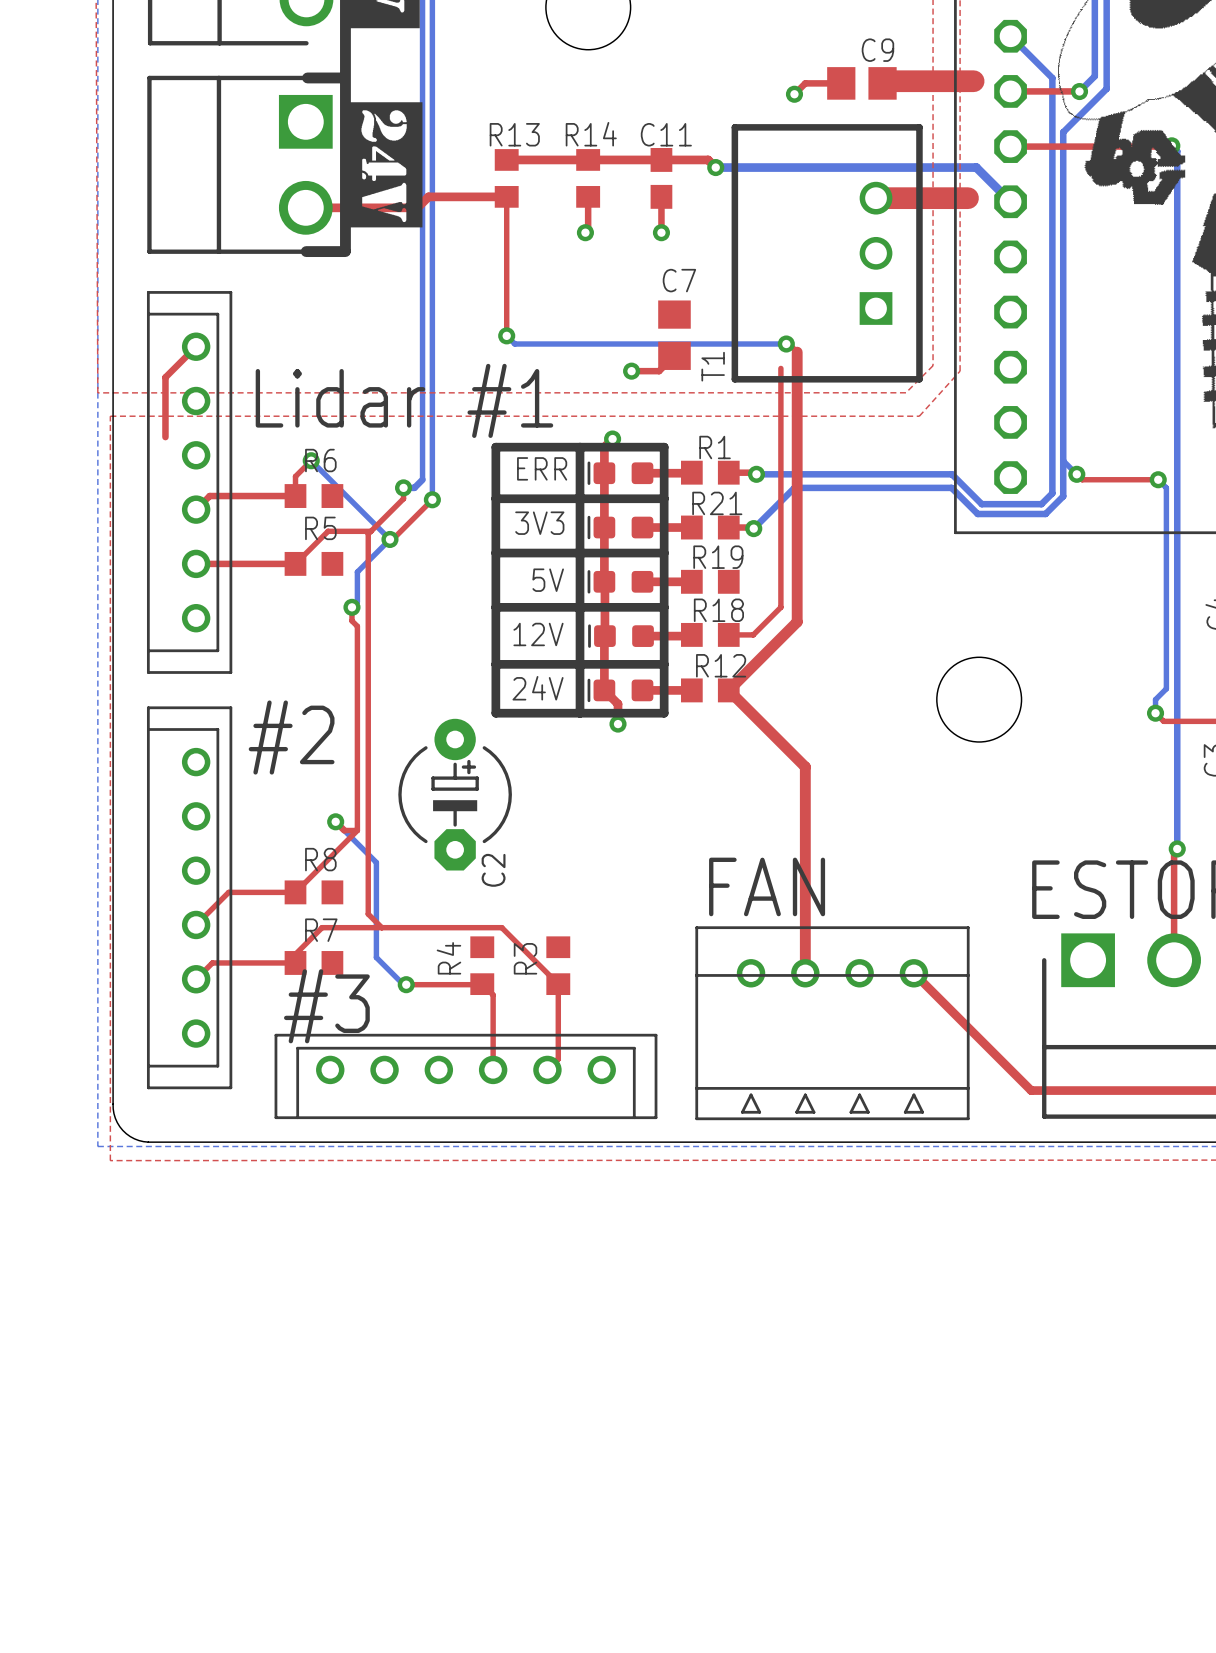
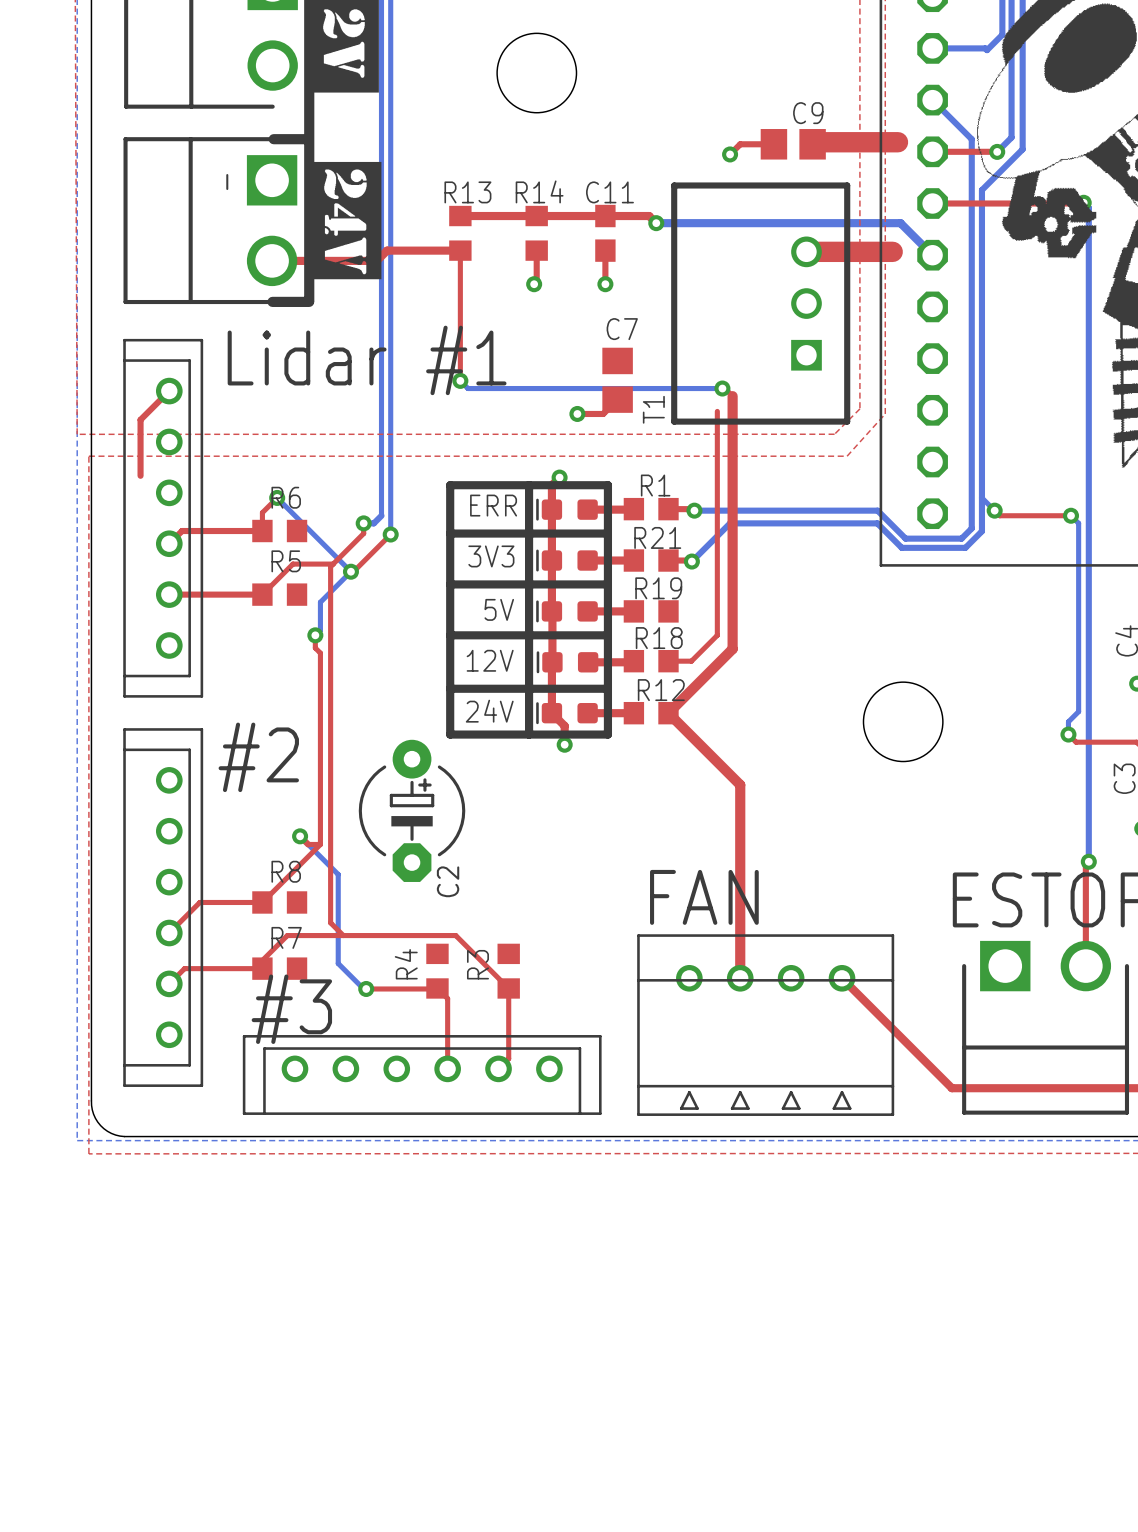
text: none -> - (227, 182)
text position: Lidar #1 (404, 400) -> Lidar #1 (367, 360)

